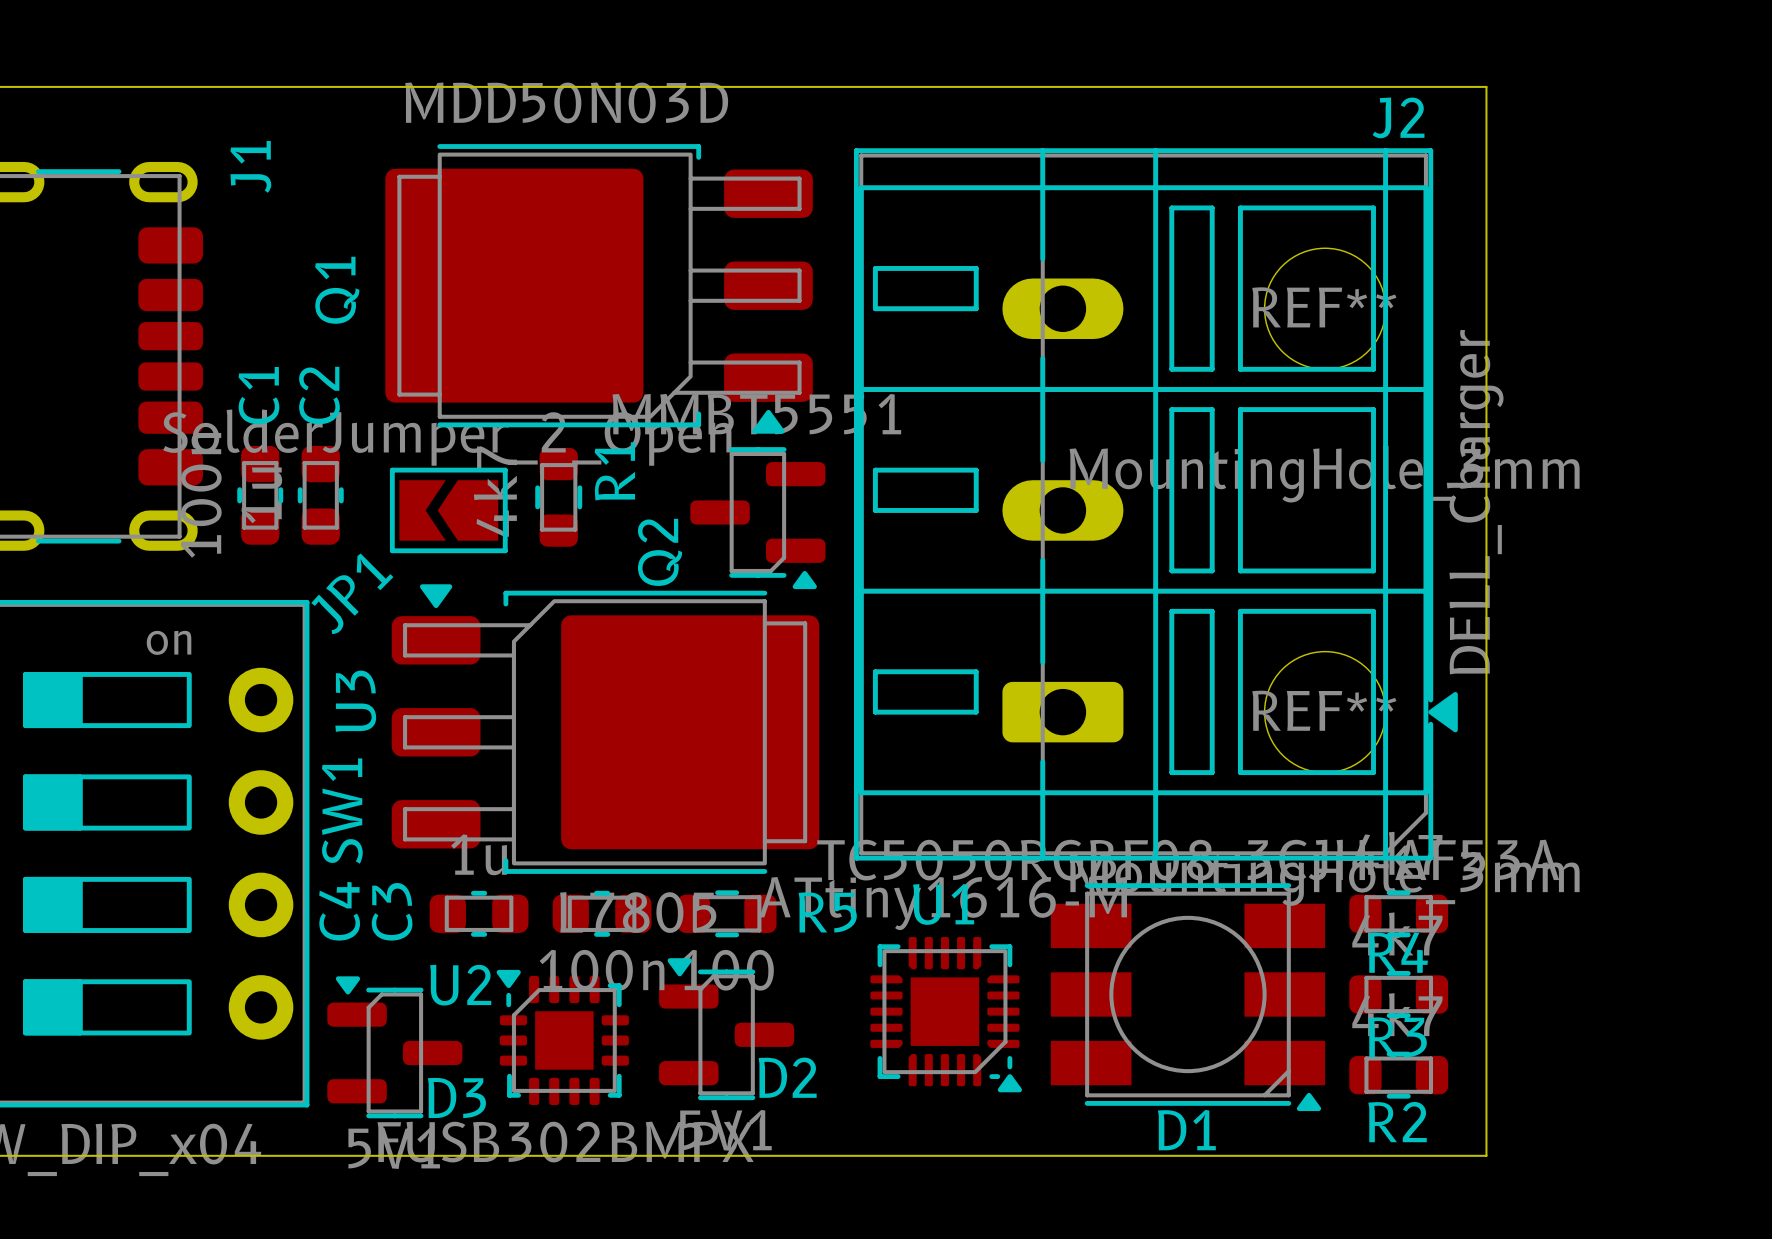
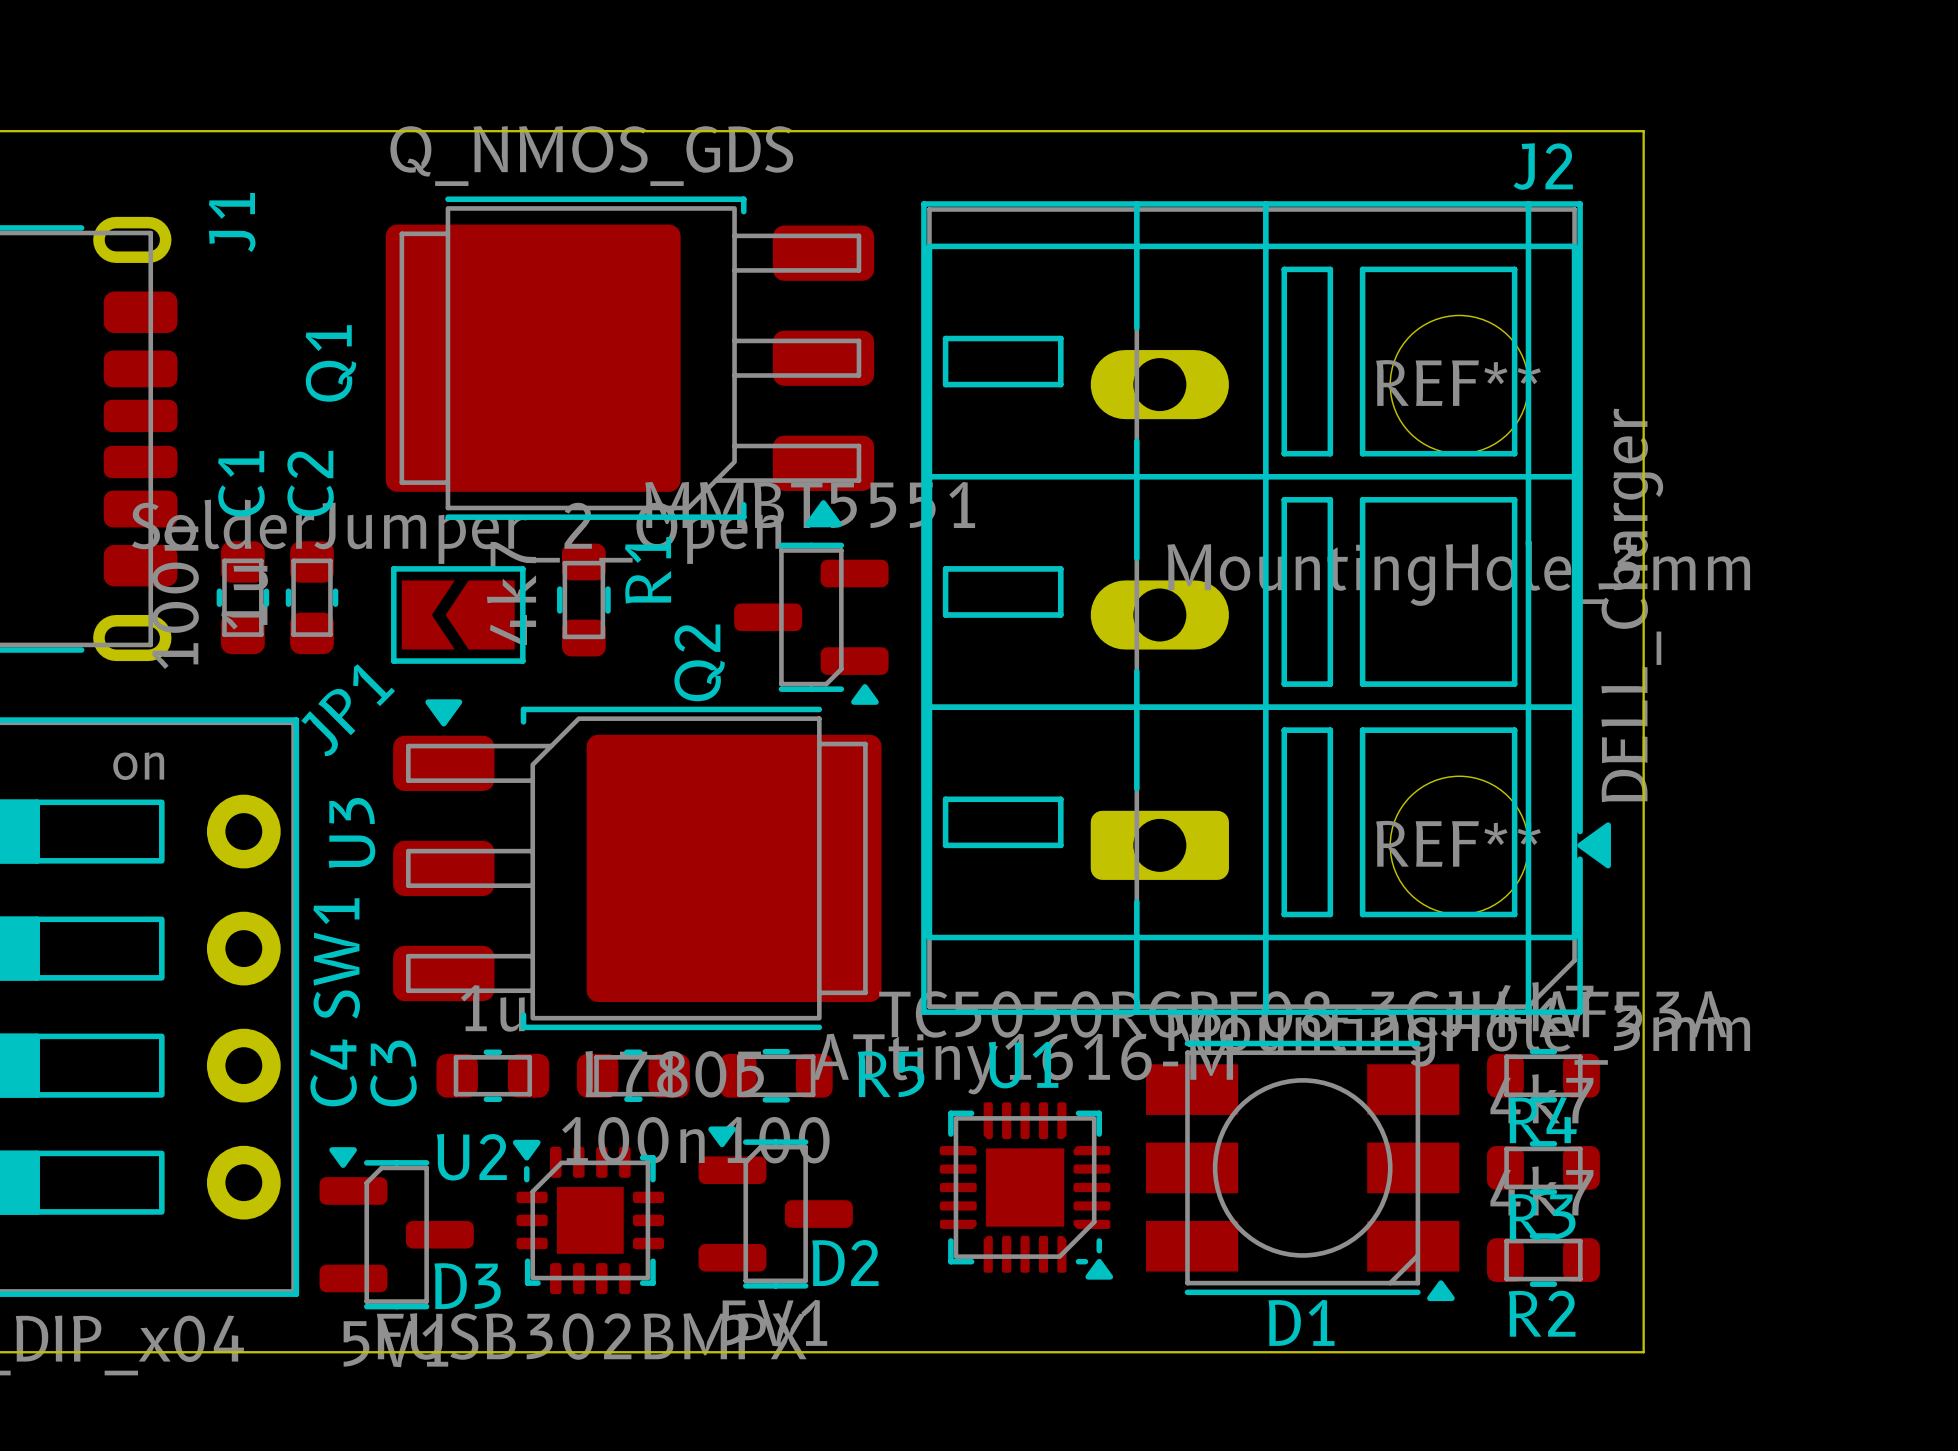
Q1 value: MDD50N03D (566, 102) -> Q_NMOS_GDS (591, 156)

